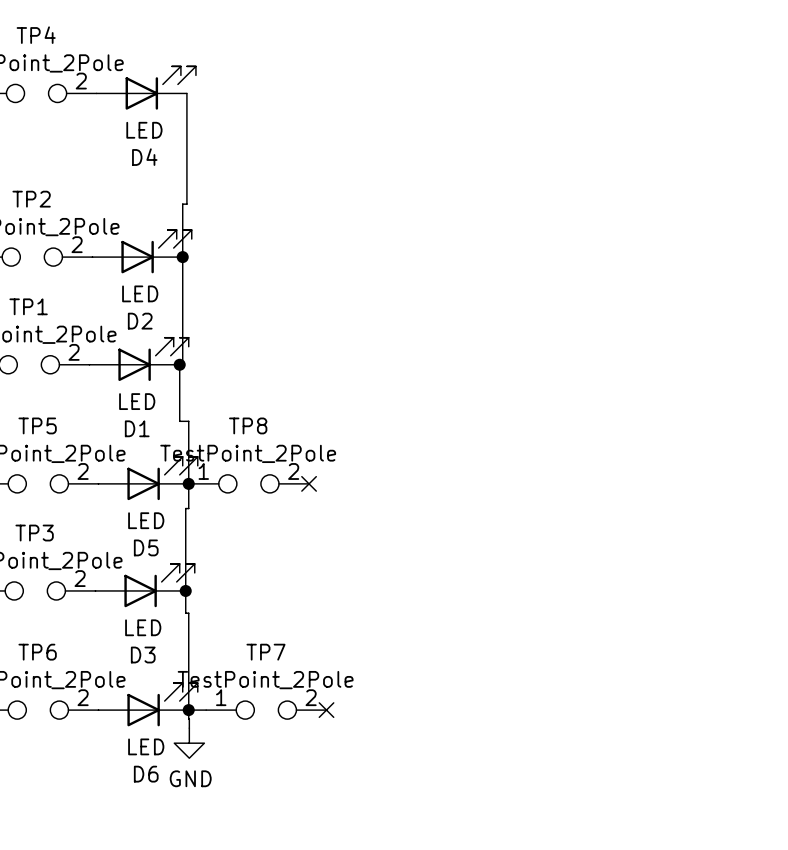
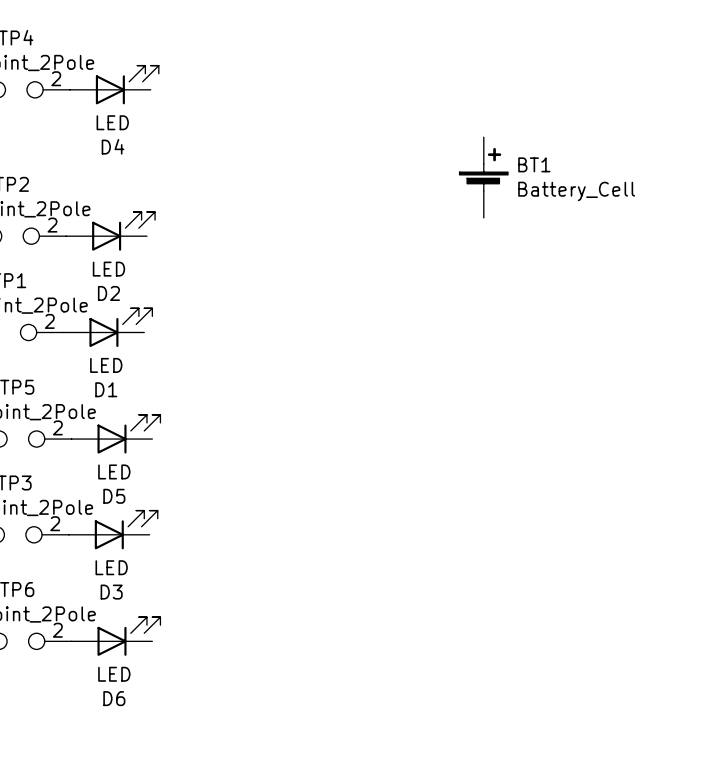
wire: (186, 93) (186, 204) (182, 204) (182, 364) (179, 364) (179, 421) (188, 421) (188, 508) (185, 508) (185, 613) (188, 613) (189, 728) -> none
BT1: none -> Battery_Cell (483, 177)
junction: (182, 257) -> none
junction: (179, 364) -> none
junction: (188, 483) -> none
TP8: TestPoint_2Pole (248, 483) -> none
no-connect mark: (309, 483) -> none
junction: (185, 590) -> none
wire: (188, 710) (206, 710) -> none
junction: (188, 710) -> none
TP7: TestPoint_2Pole (266, 710) -> none
no-connect mark: (326, 710) -> none
power symbol: GND (189, 743) -> none

